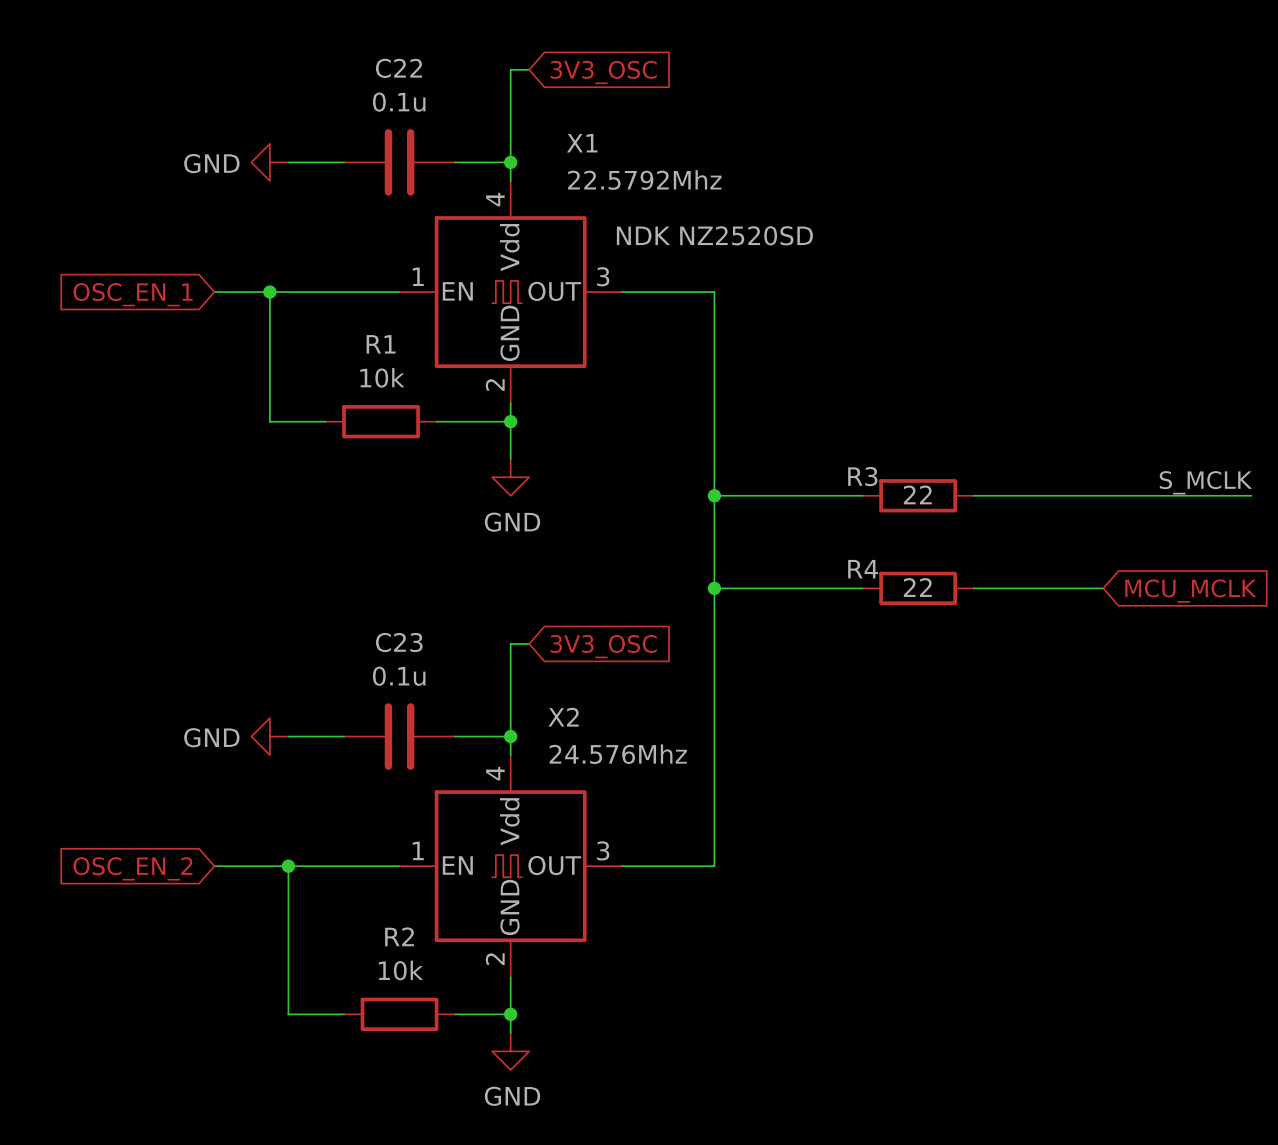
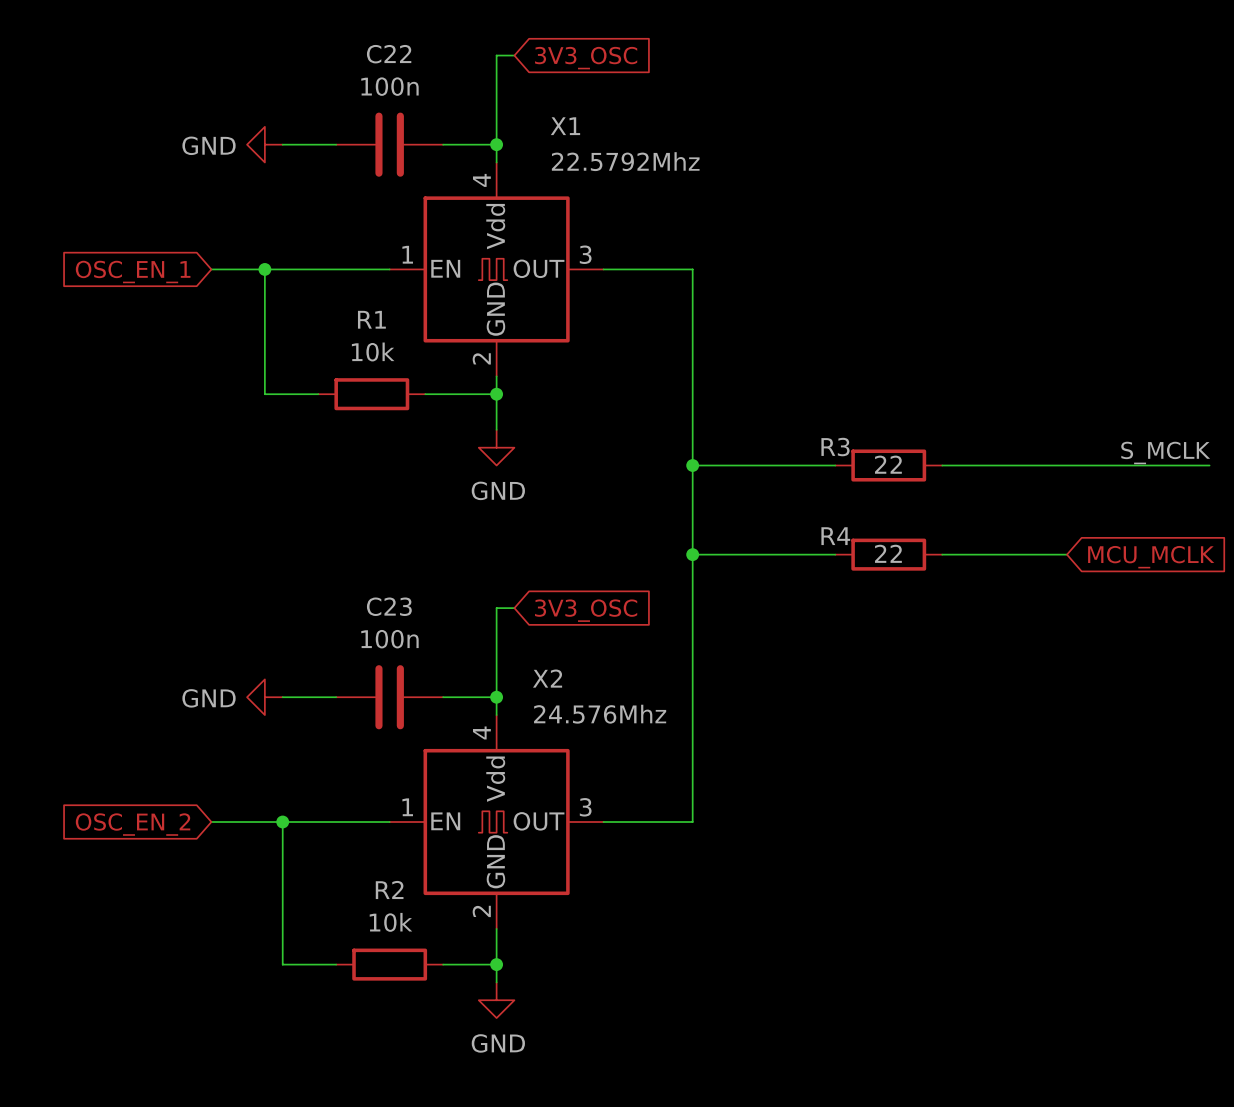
C22 value: 0.1u (399, 102) -> 100n (389, 86)
X1 text: NDK NZ2520SD (714, 235) -> none
C23 value: 0.1u (399, 676) -> 100n (389, 639)

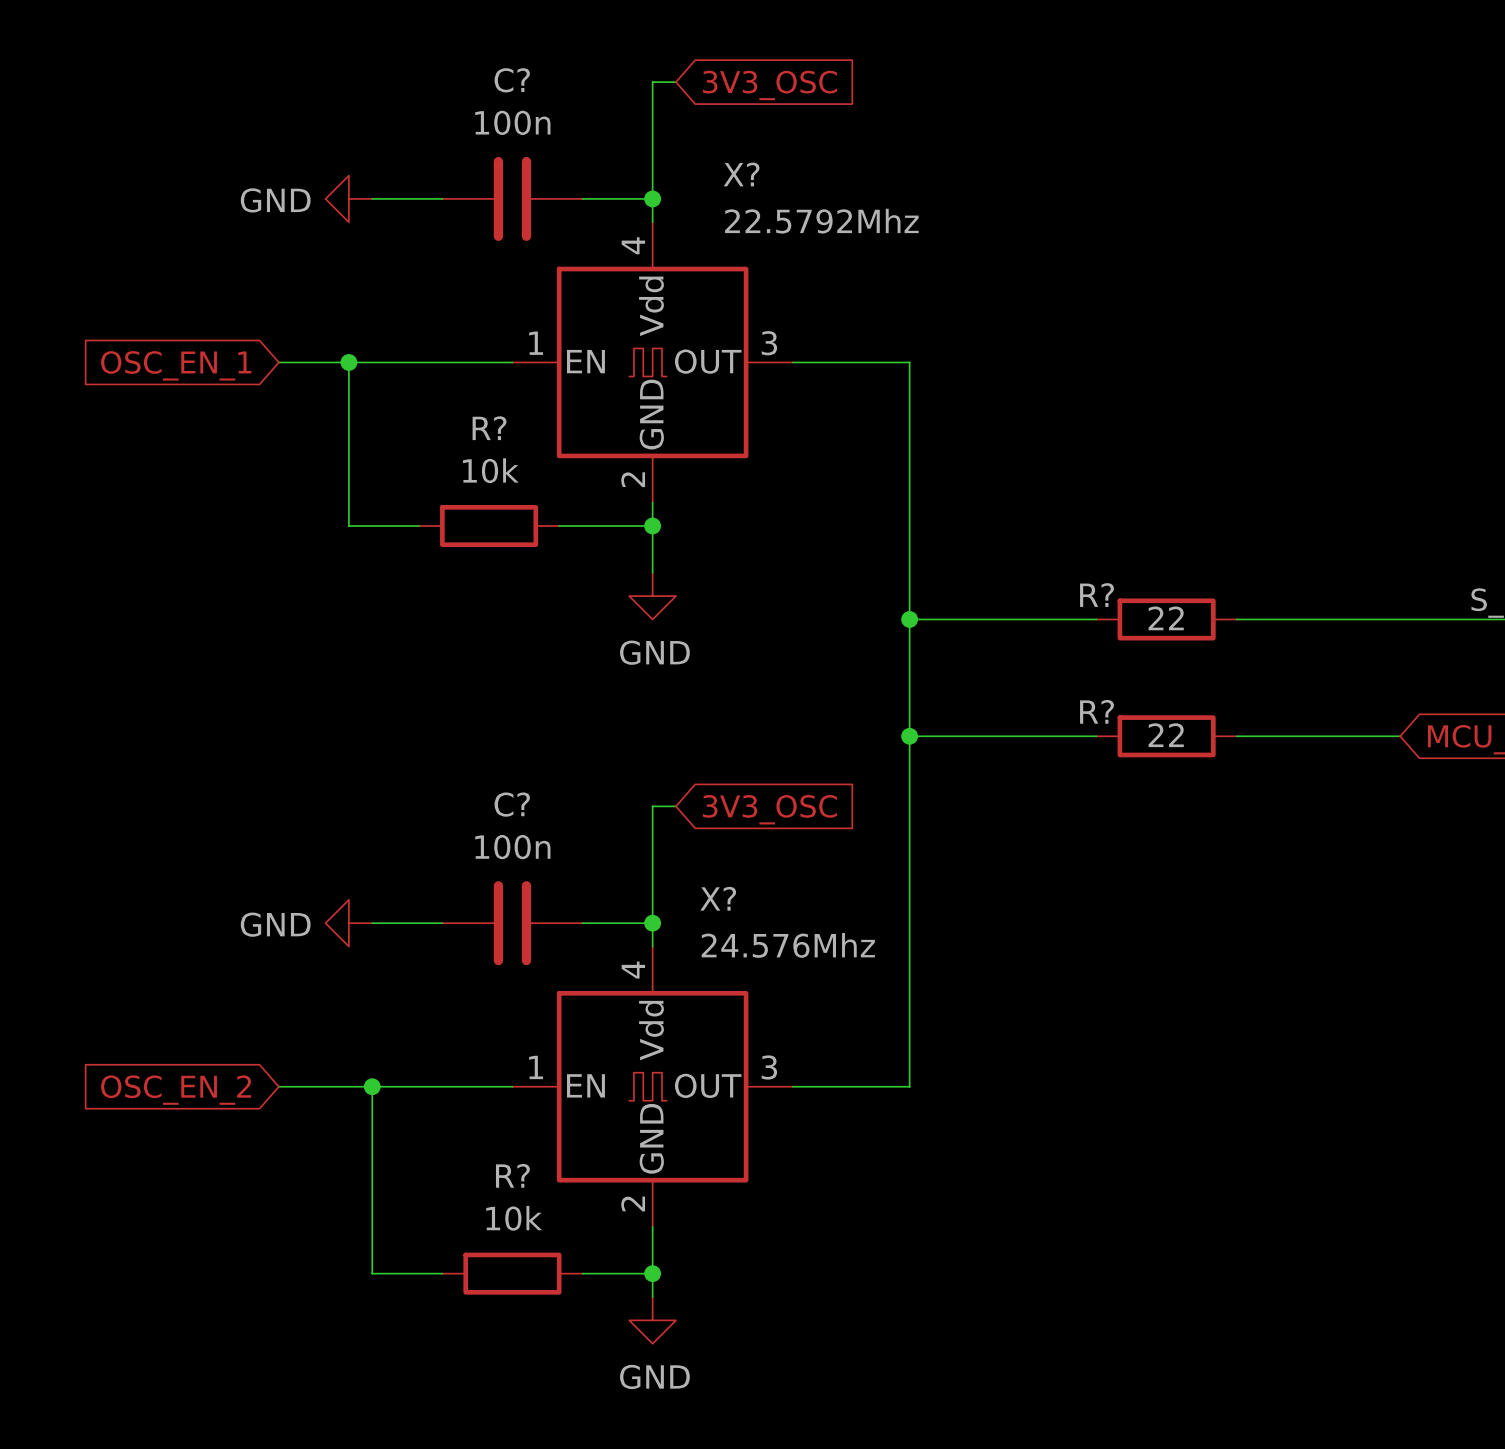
C22 name: C22 (389, 54) -> C? (512, 80)
X1 name: X1 (565, 126) -> X? (741, 174)
R1 name: R1 (371, 319) -> R? (489, 428)
R3 name: R3 (835, 447) -> R? (1096, 595)
R4 name: R4 (835, 536) -> R? (1096, 711)
C23 name: C23 (389, 606) -> C? (512, 804)
X2 name: X2 (547, 678) -> X? (718, 898)
R2 name: R2 (389, 889) -> R? (512, 1175)

